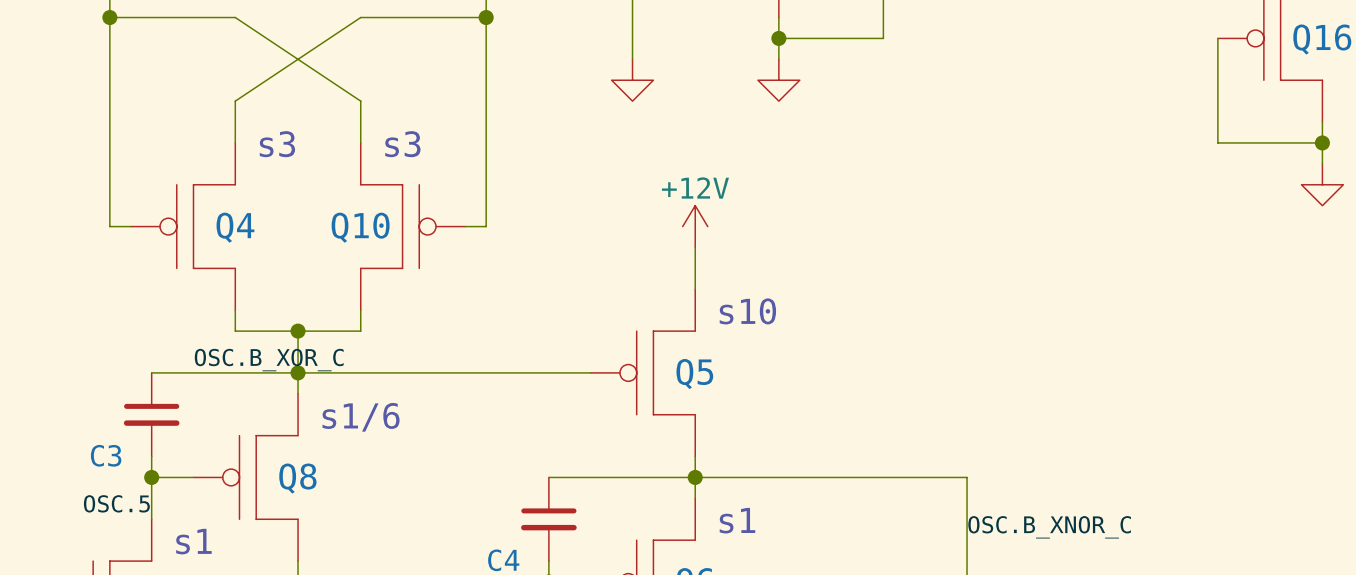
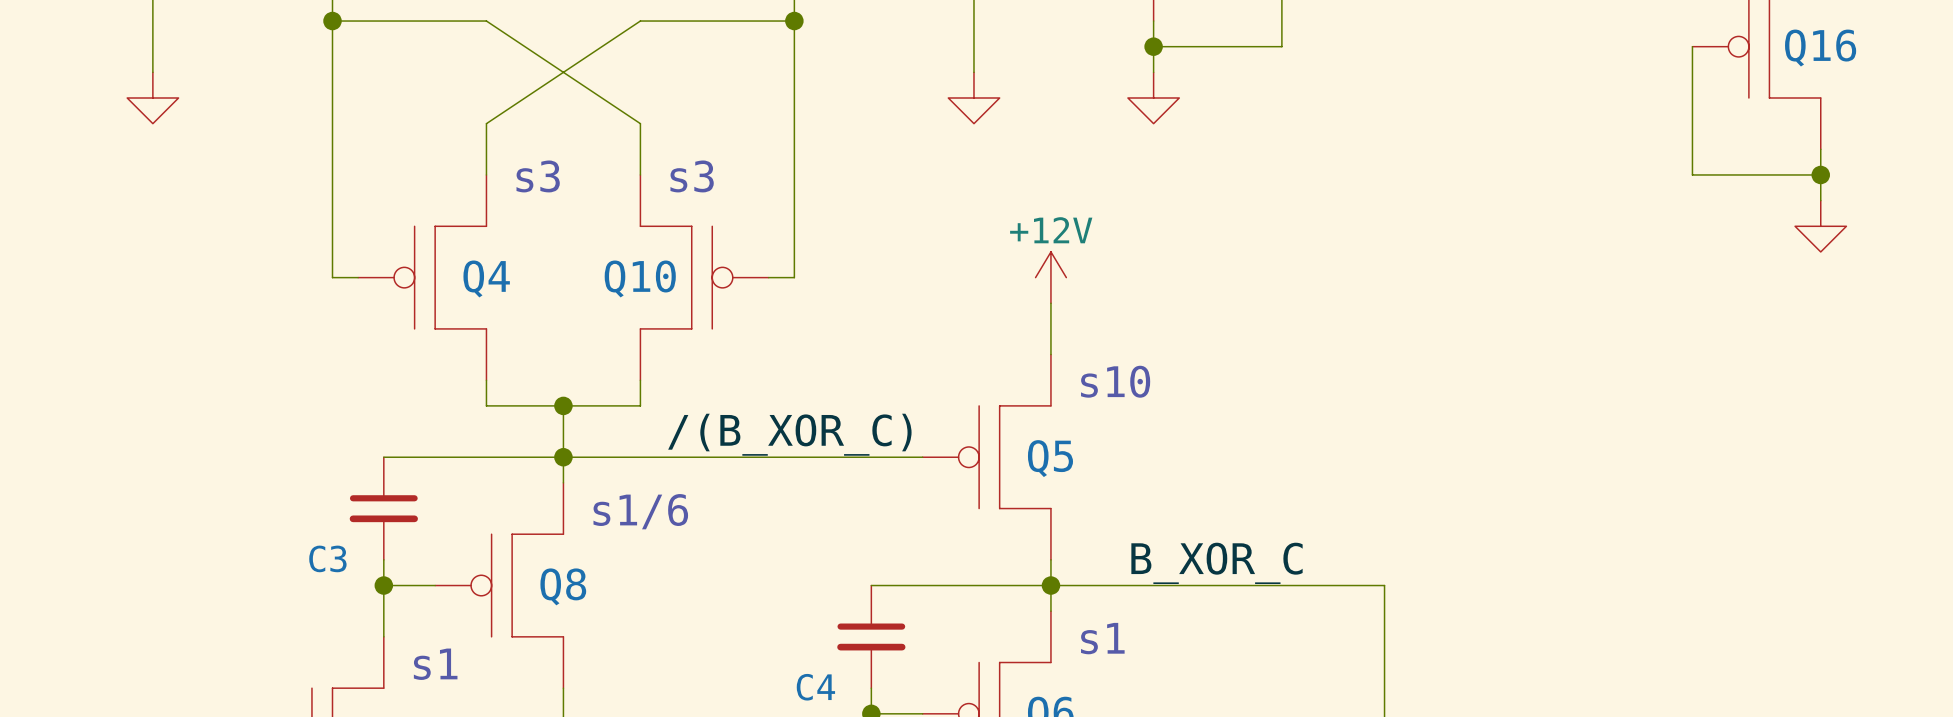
label: OSC.B_XOR_C (269, 360) -> /(B_XOR_C) (789, 434)
label: none -> B_XOR_C (1217, 563)
label: OSC.5 (116, 503) -> none
label: OSC.B_XNOR_C (1049, 527) -> none

